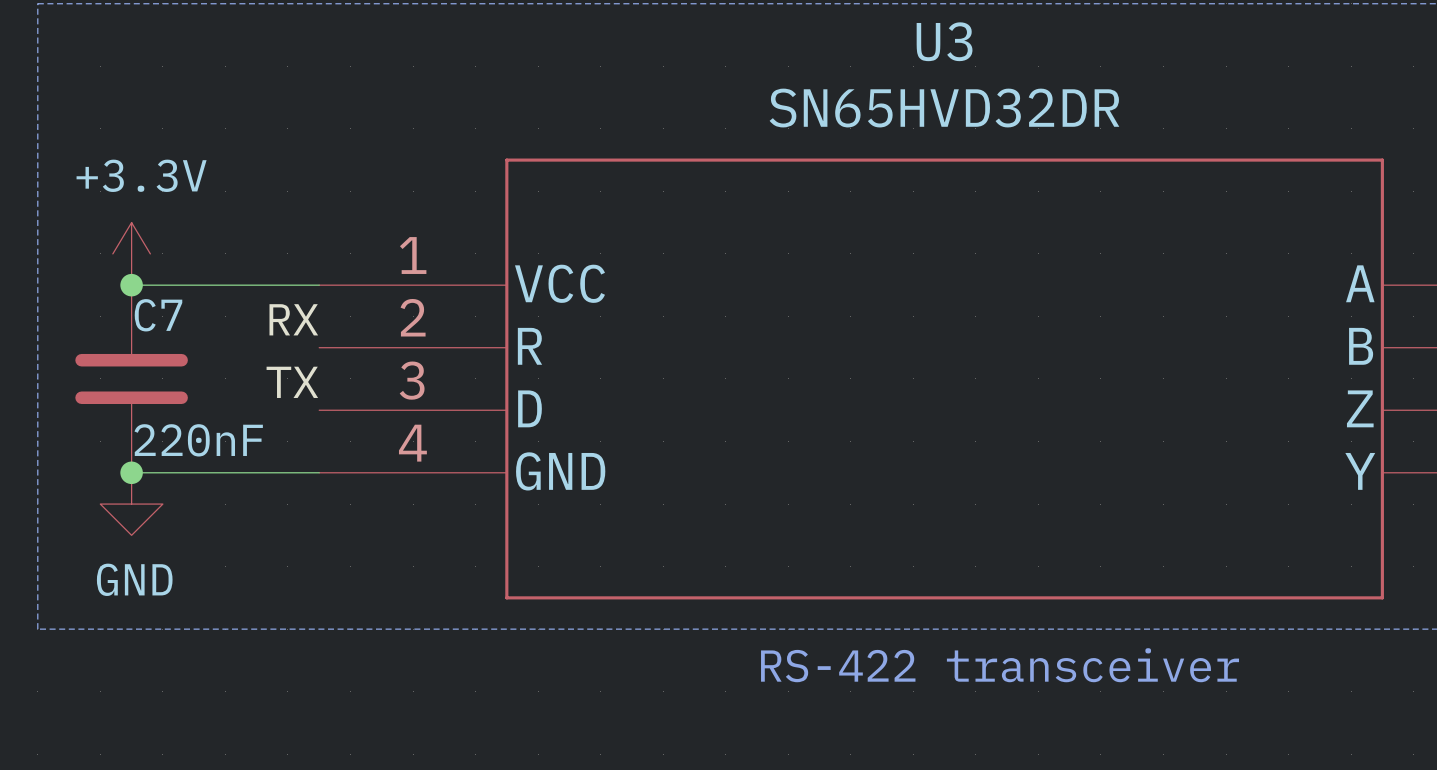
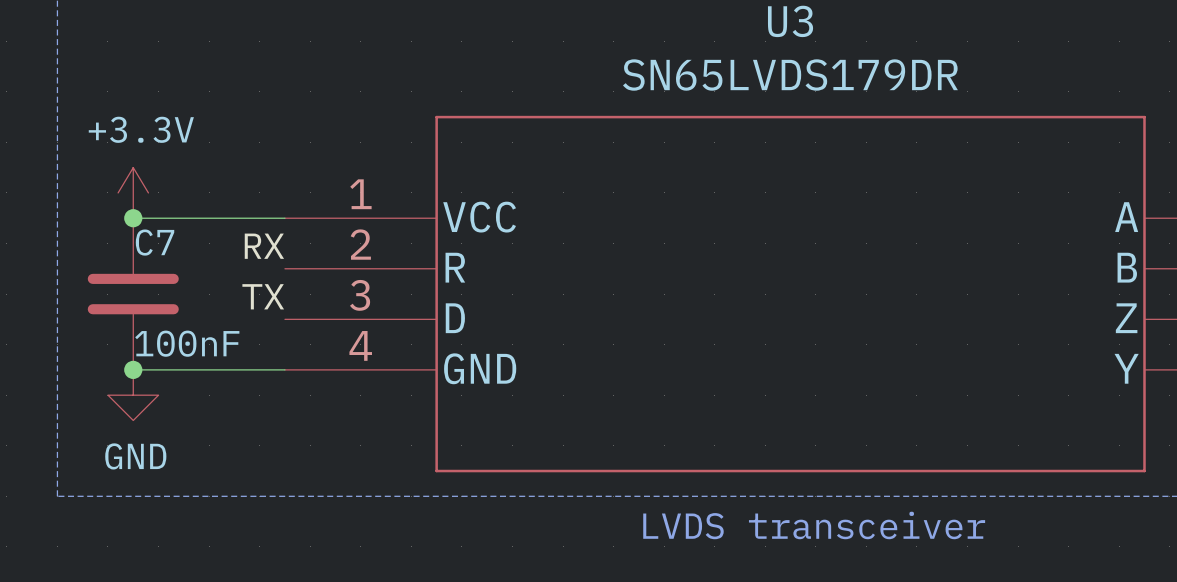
U3 value: SN65HVD32DR (944, 108) -> SN65LVDS179DR (790, 75)
C7 value: 220nF (198, 440) -> 100nF (187, 343)
text: RS-422 transceiver (1000, 665) -> LVDS transceiver (814, 525)

